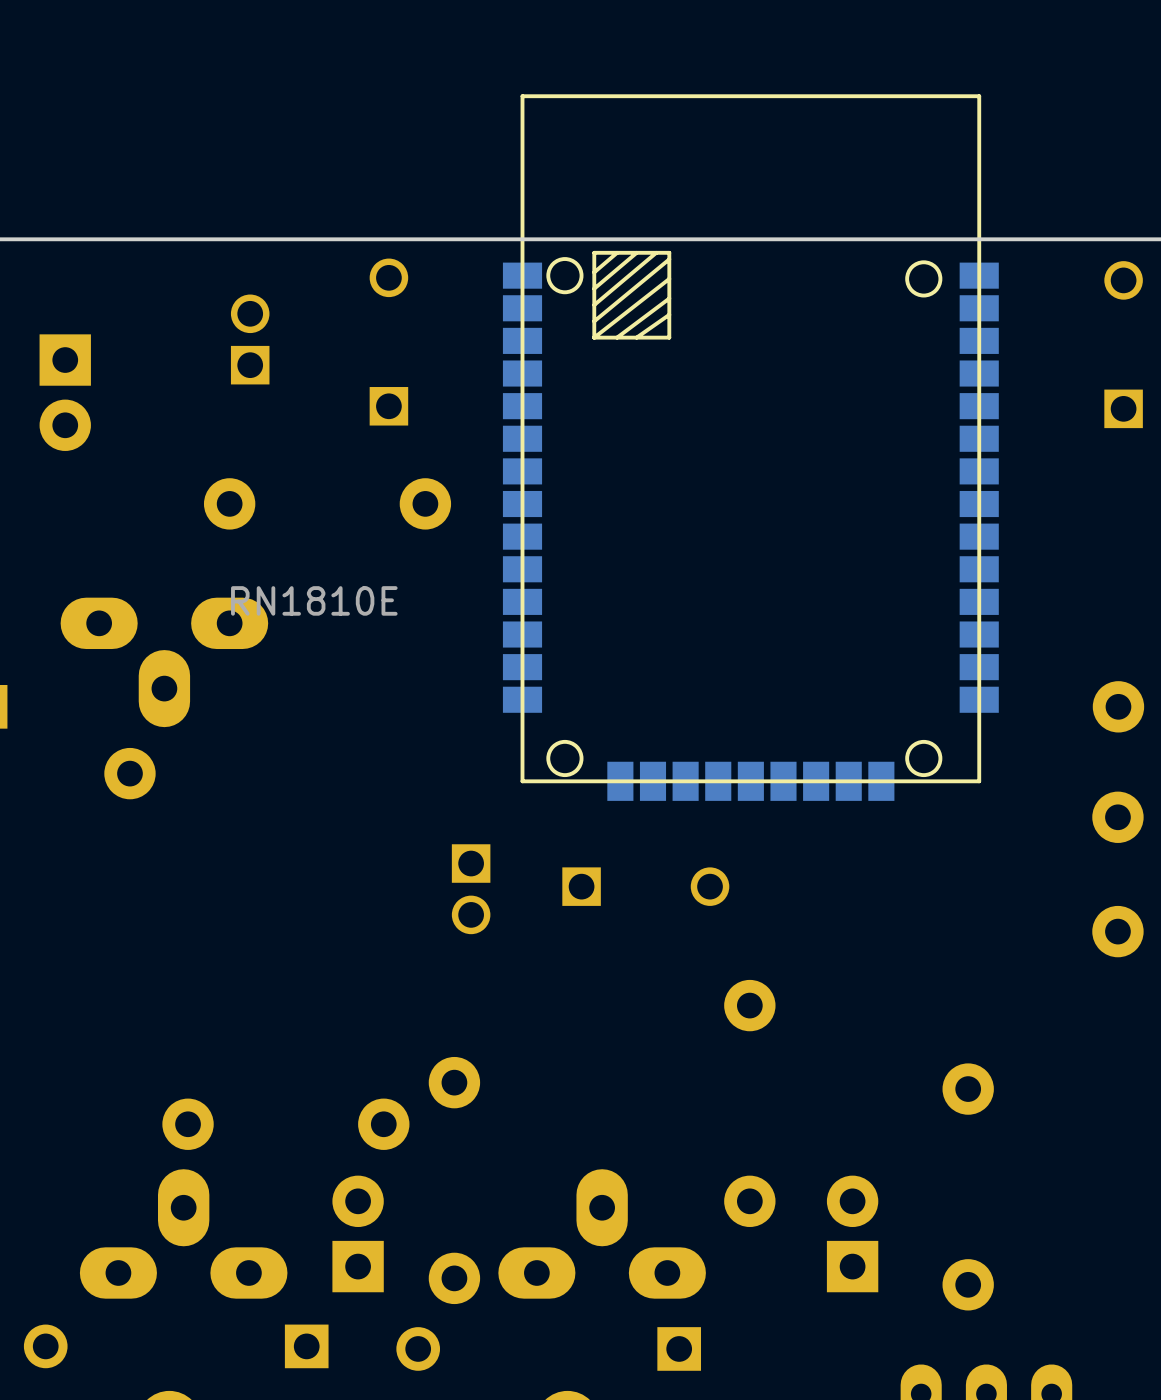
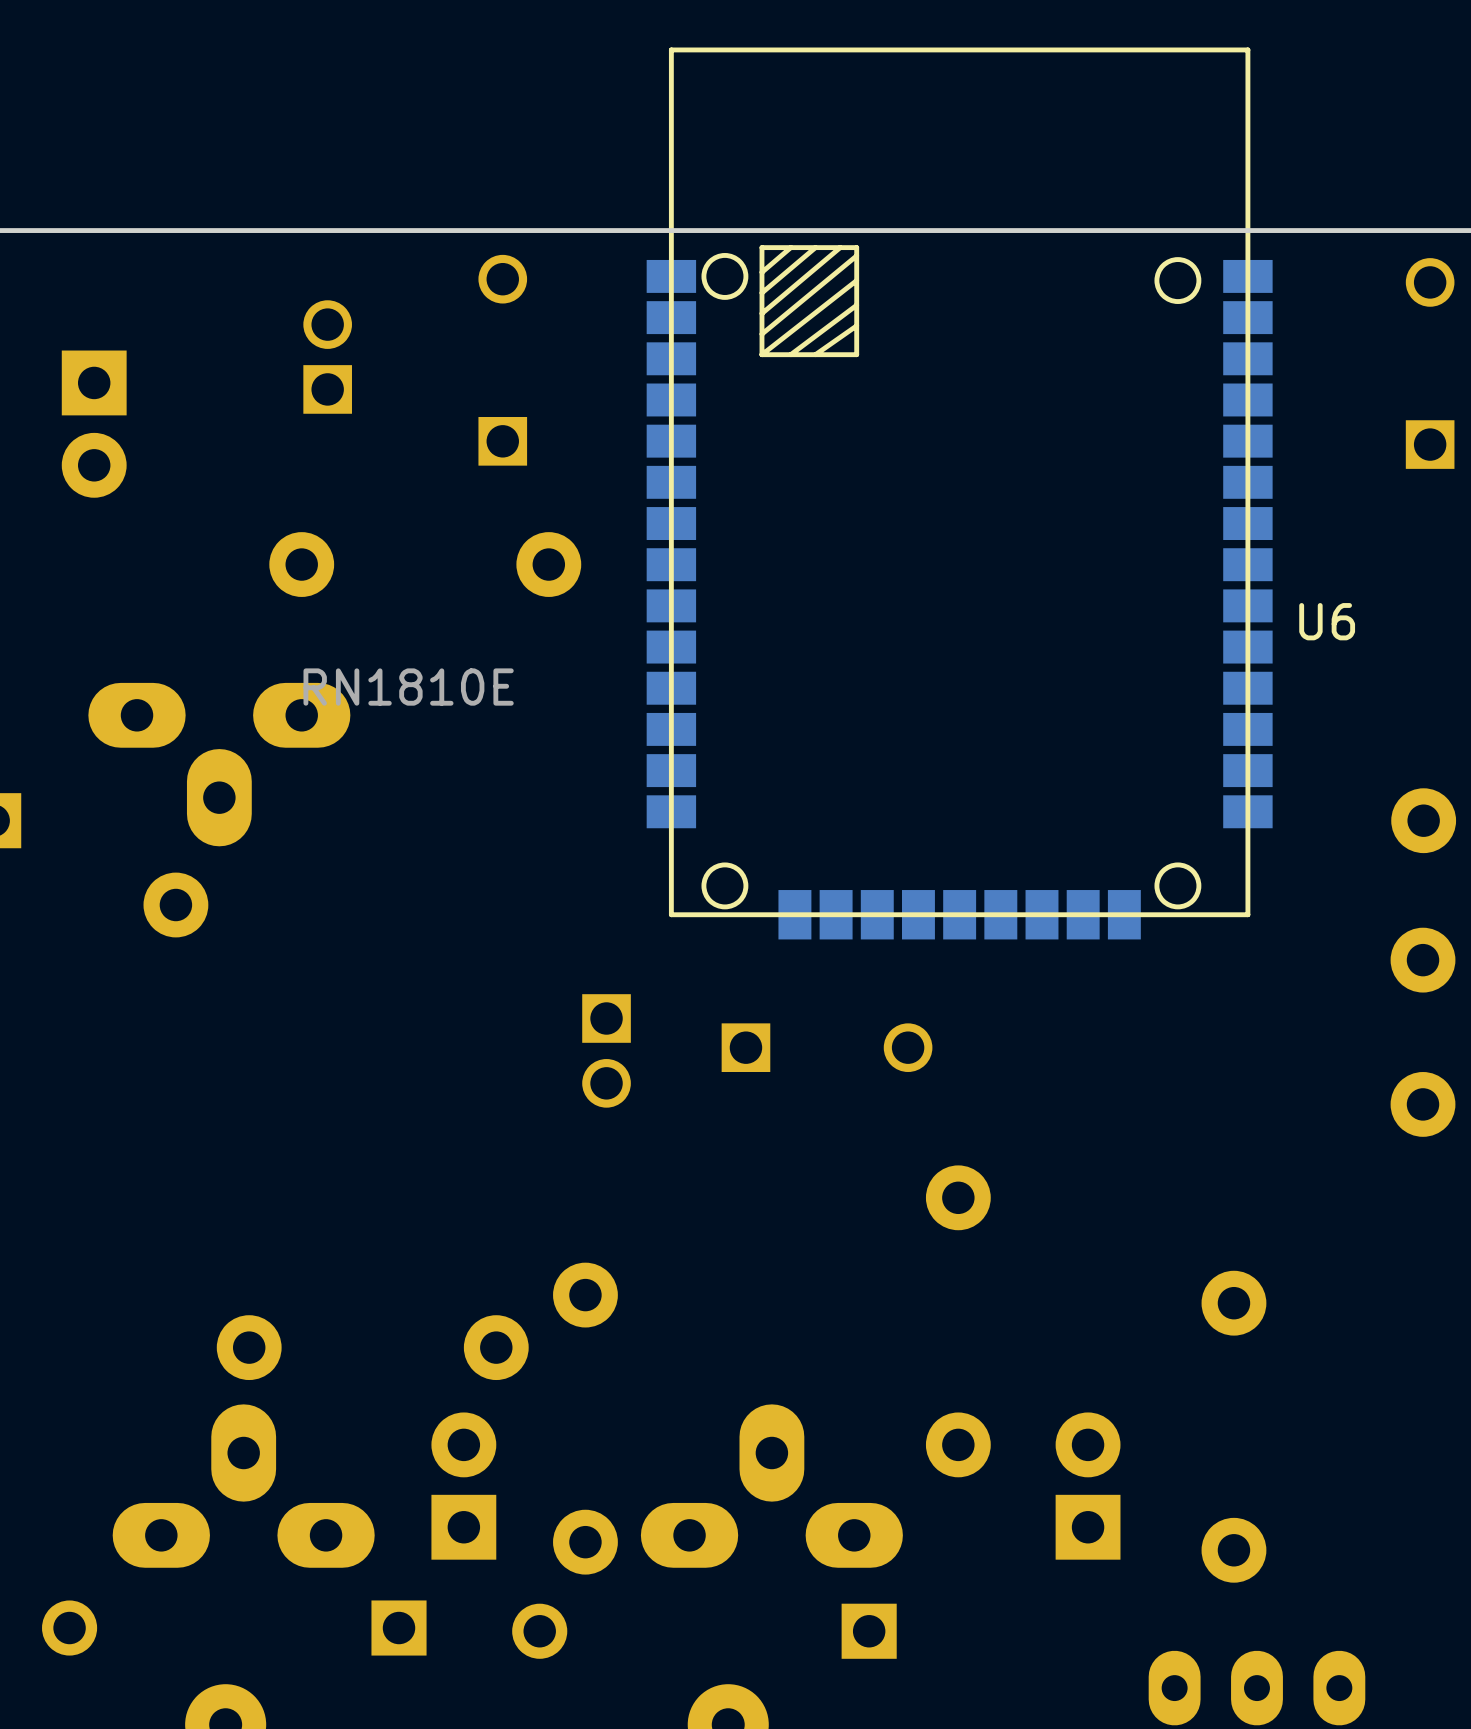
U6 name: none -> U6 (1327, 621)

